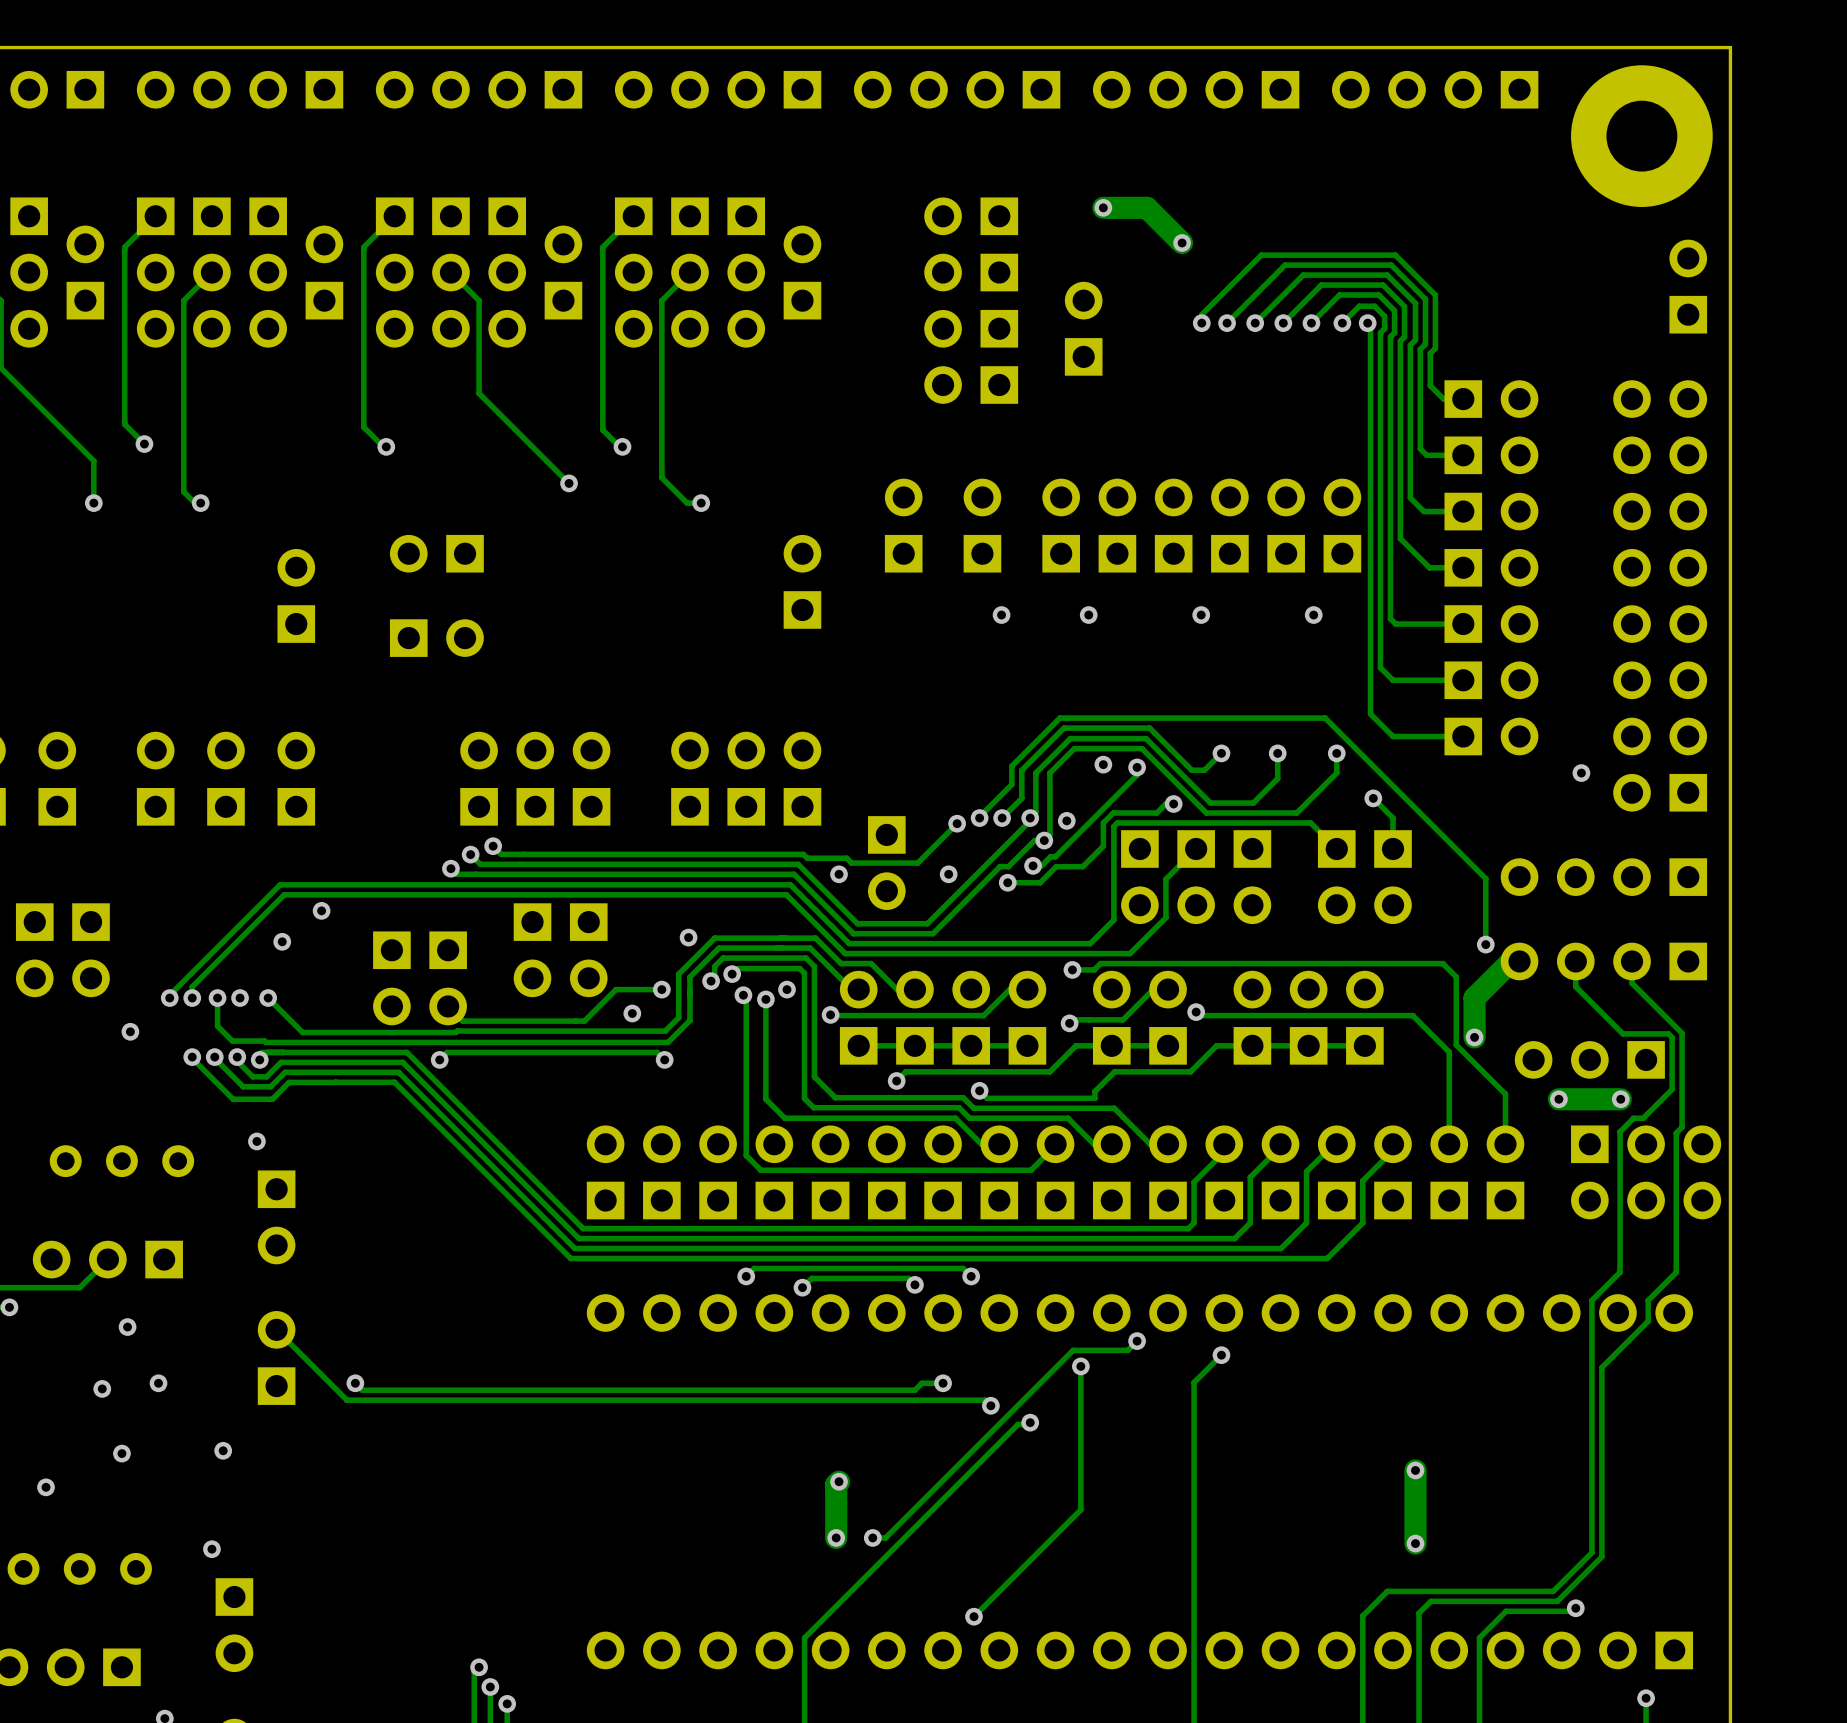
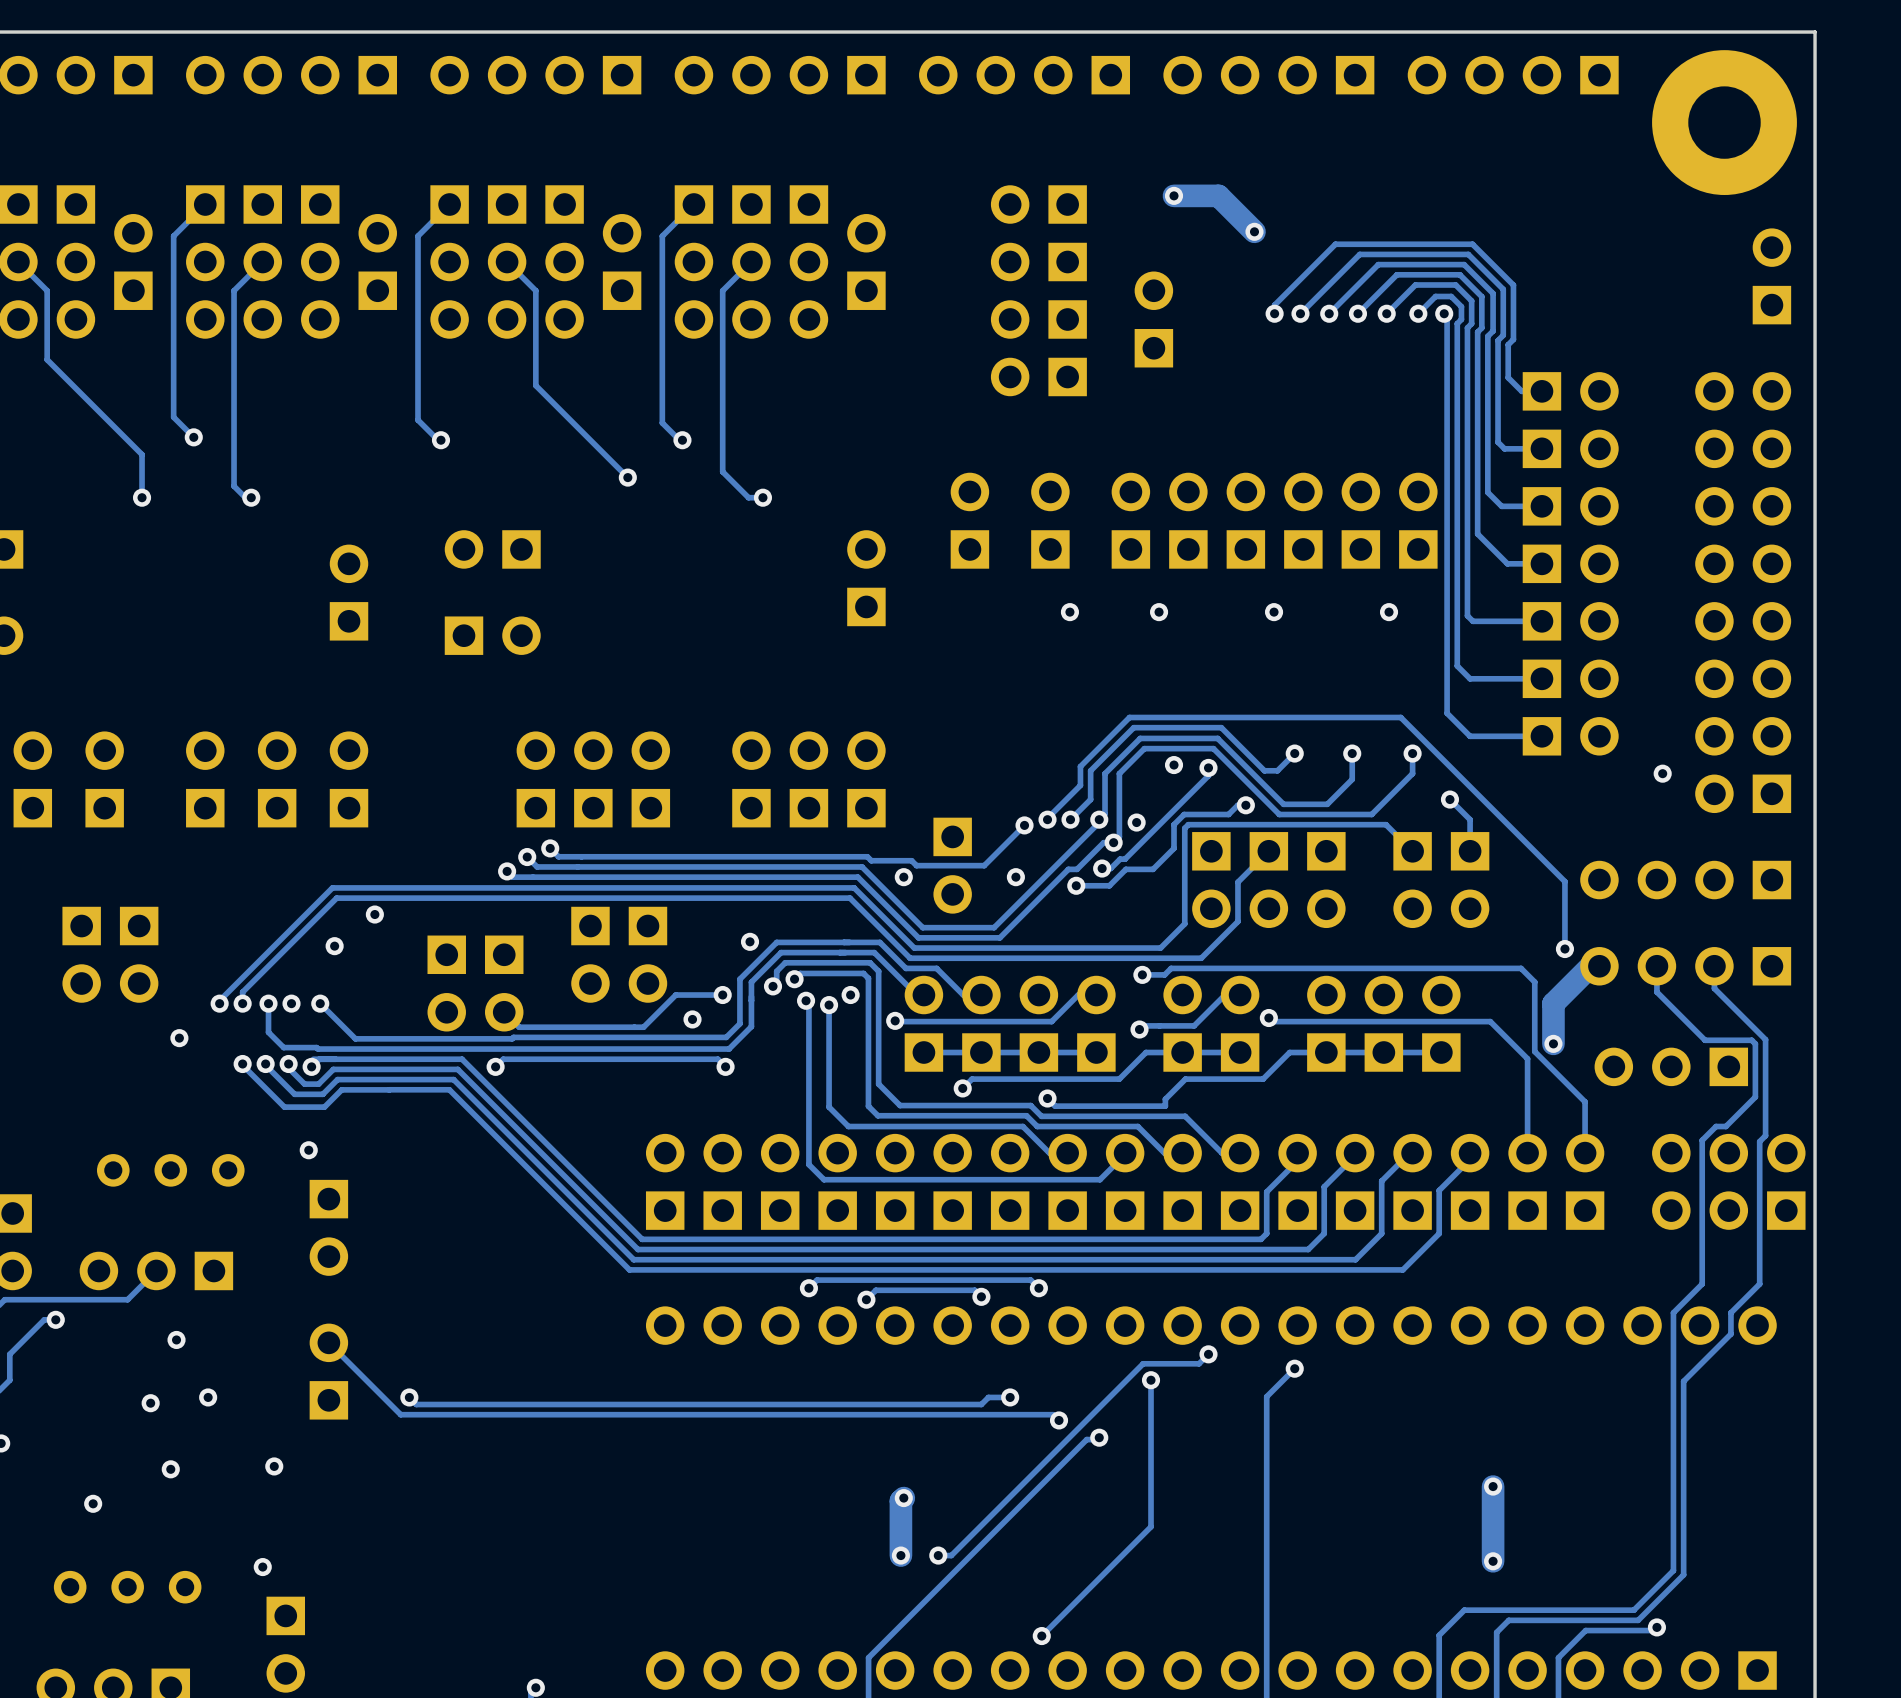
via: (1558, 1099) -> none
track: (1620, 1099) (1558, 1099) -> none
via: (1620, 1099) -> none
part rotation: 0° (1646, 1172) -> 180° (1728, 1181)

